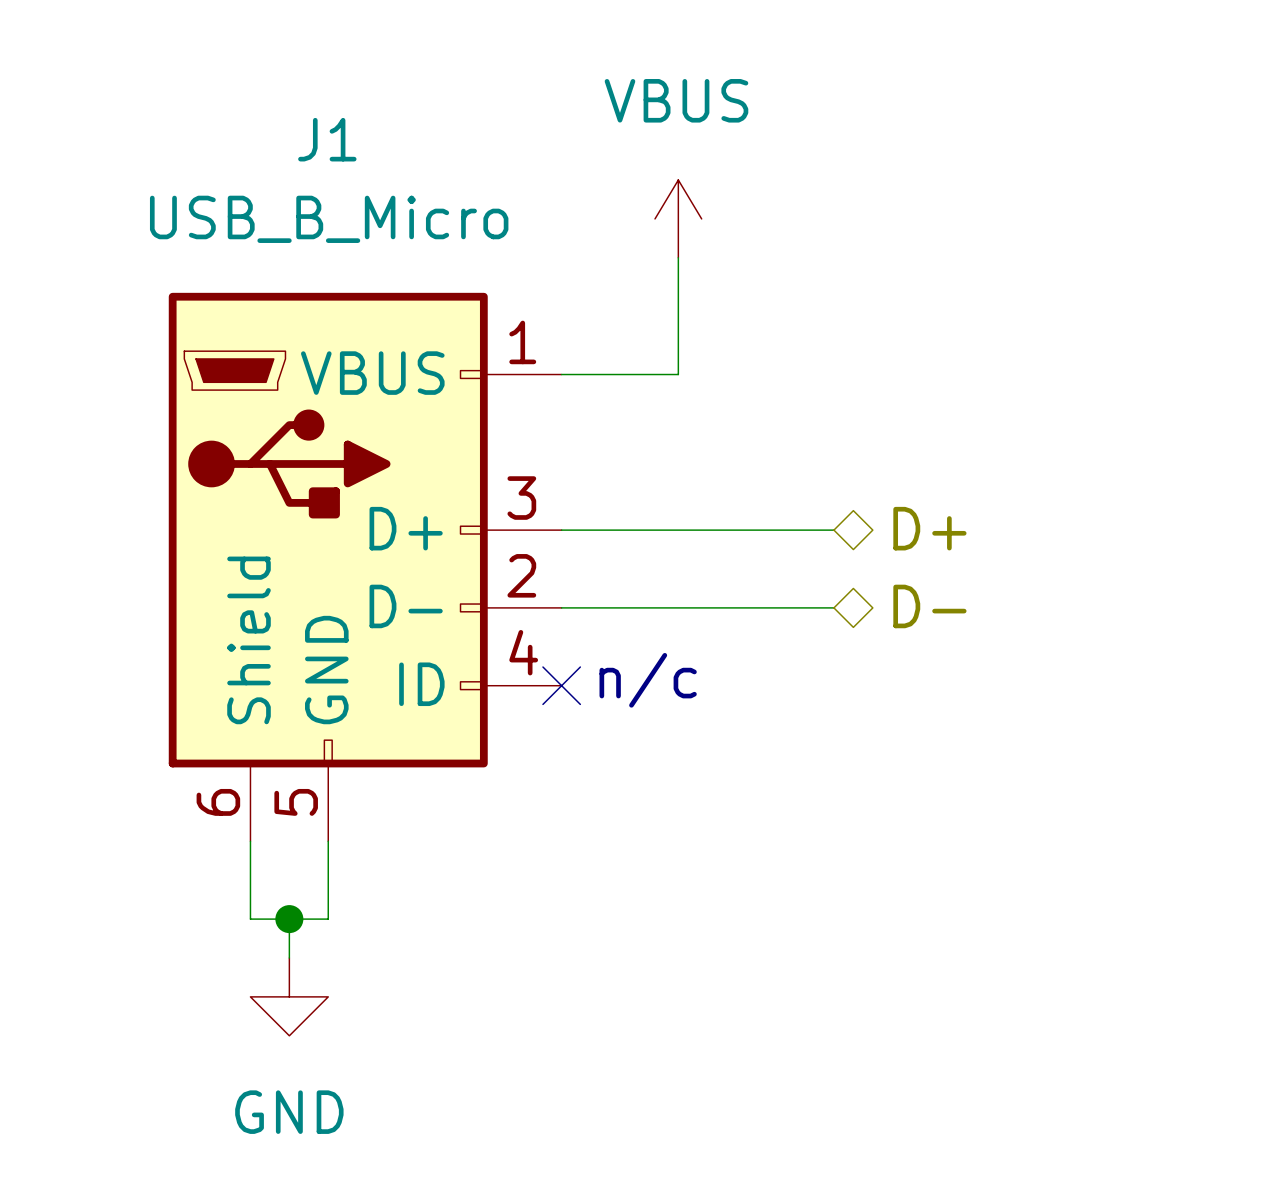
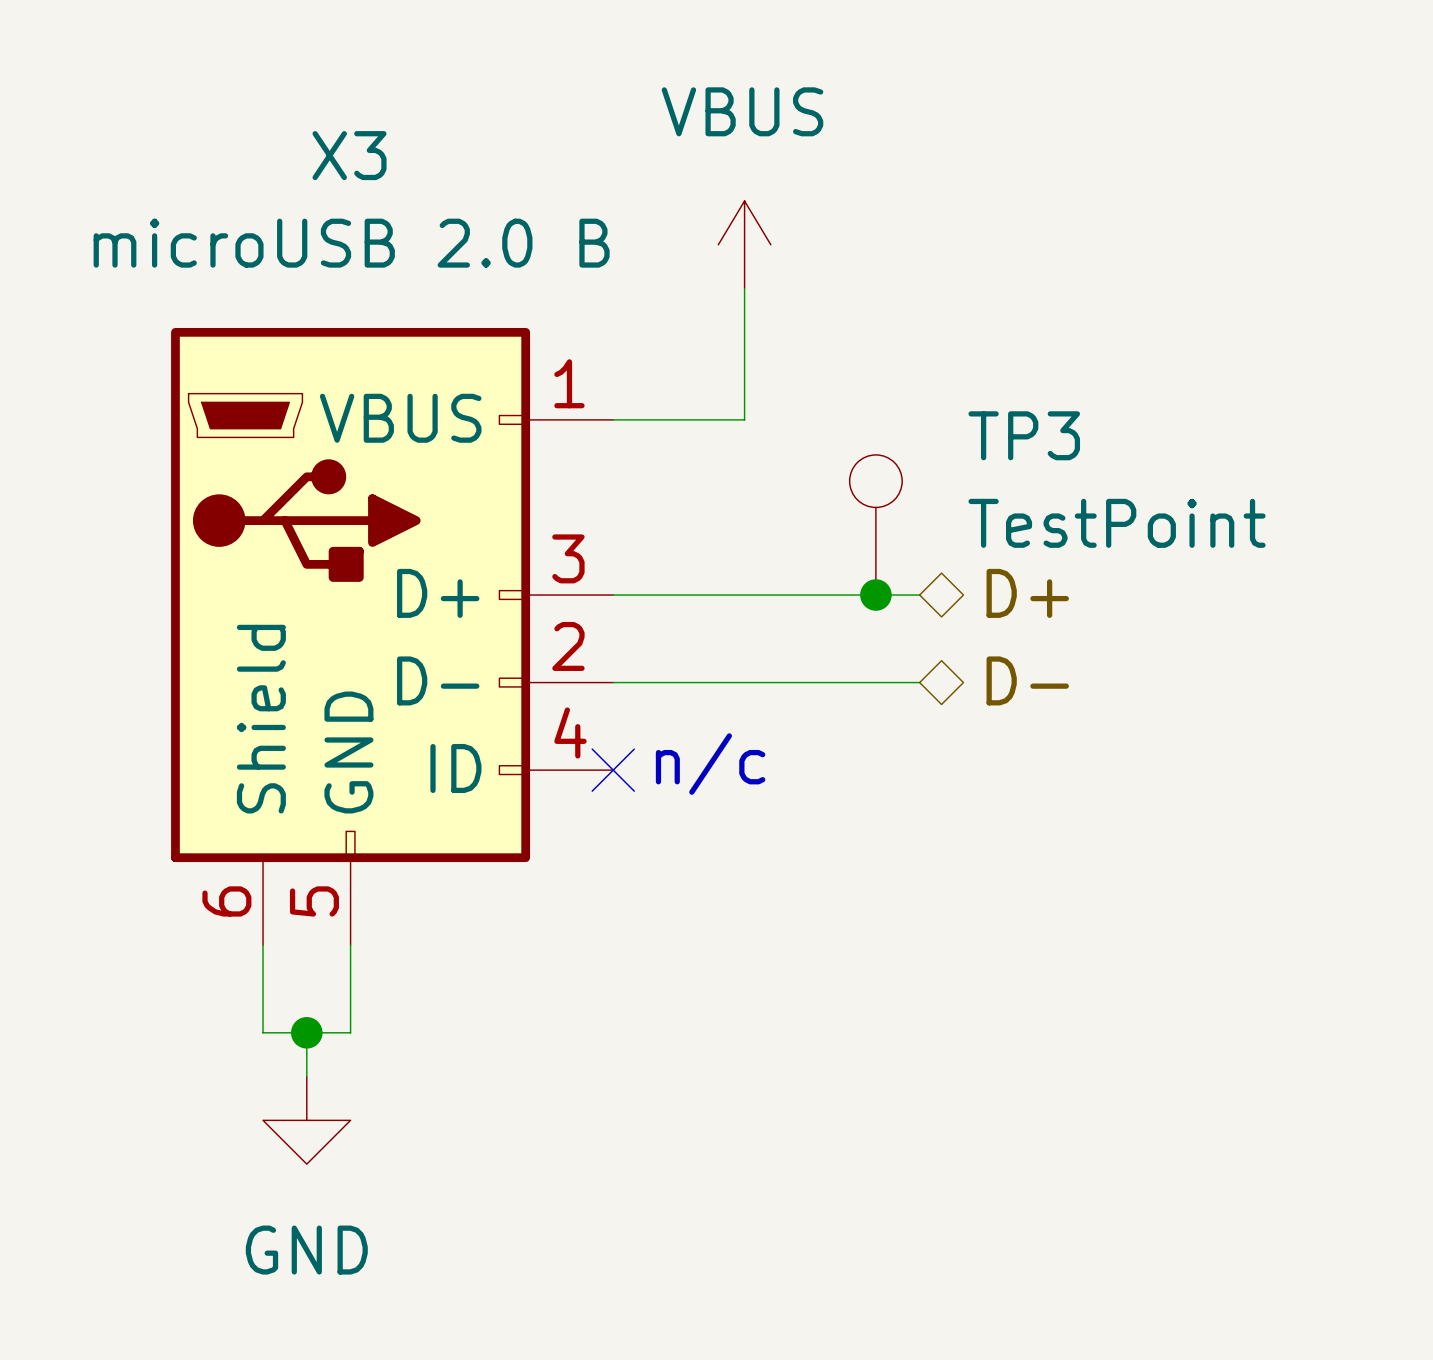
J1 name: J1 (327, 139) -> X3 (349, 155)
J1 value: USB_B_Micro (329, 219) -> microUSB 2.0 B (351, 243)
TP3: none -> TestPoint (875, 524)
junction: none -> (875, 595)

